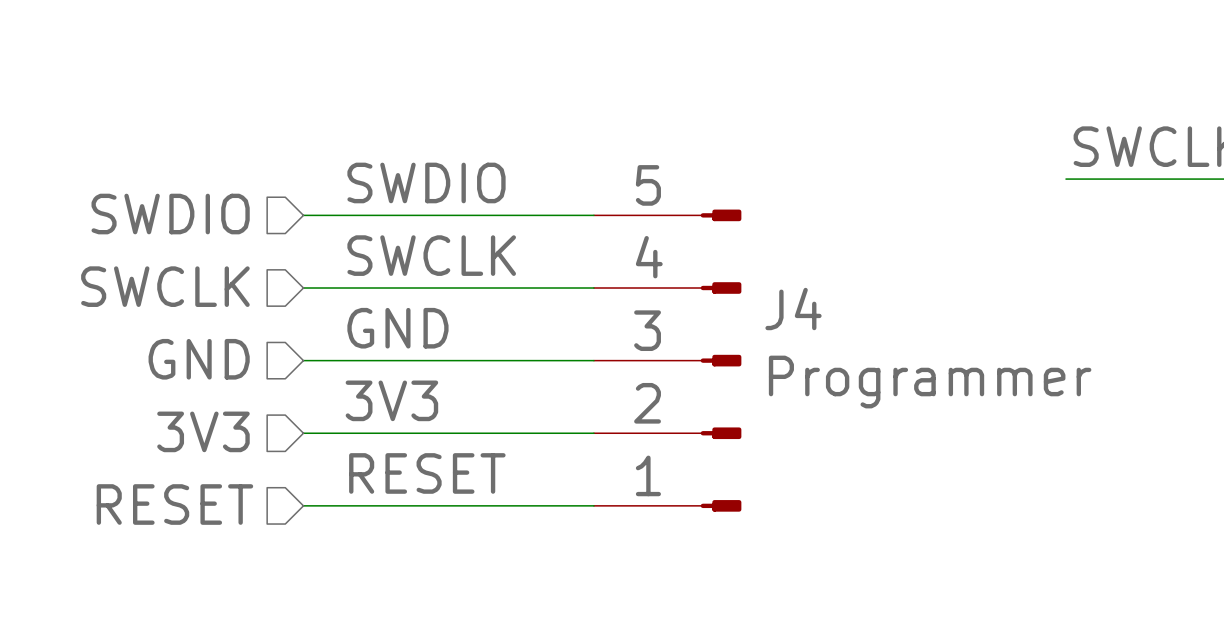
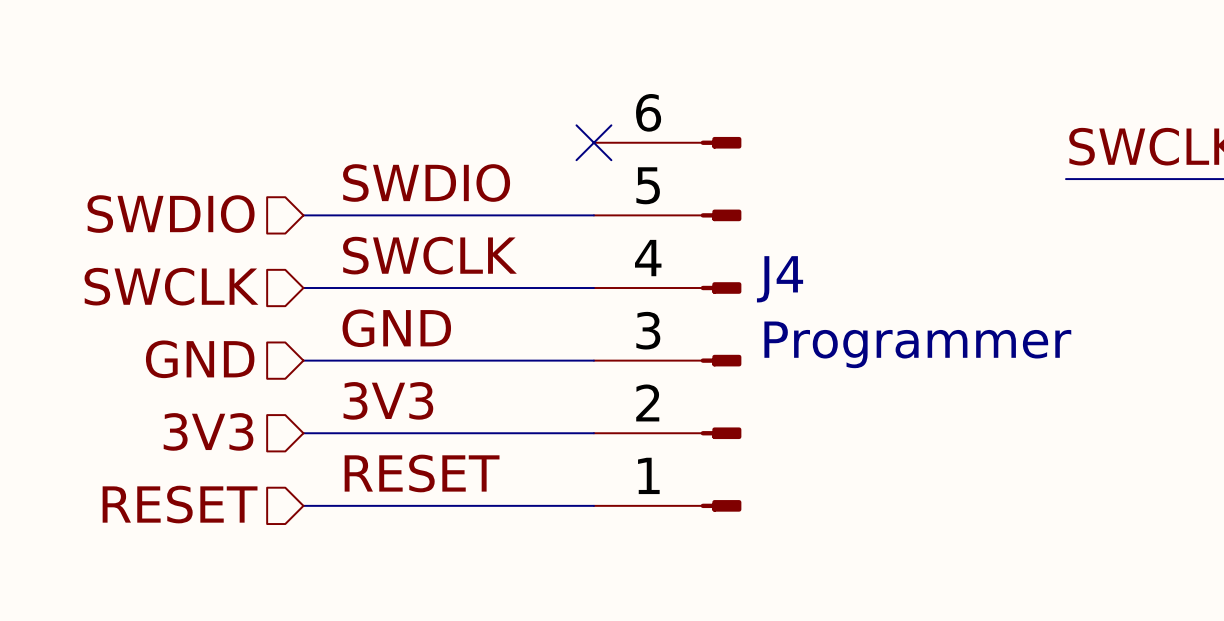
no-connect mark: none -> (593, 142)
J4 symbol: [593, 209, 742, 512] -> [593, 136, 742, 512]

